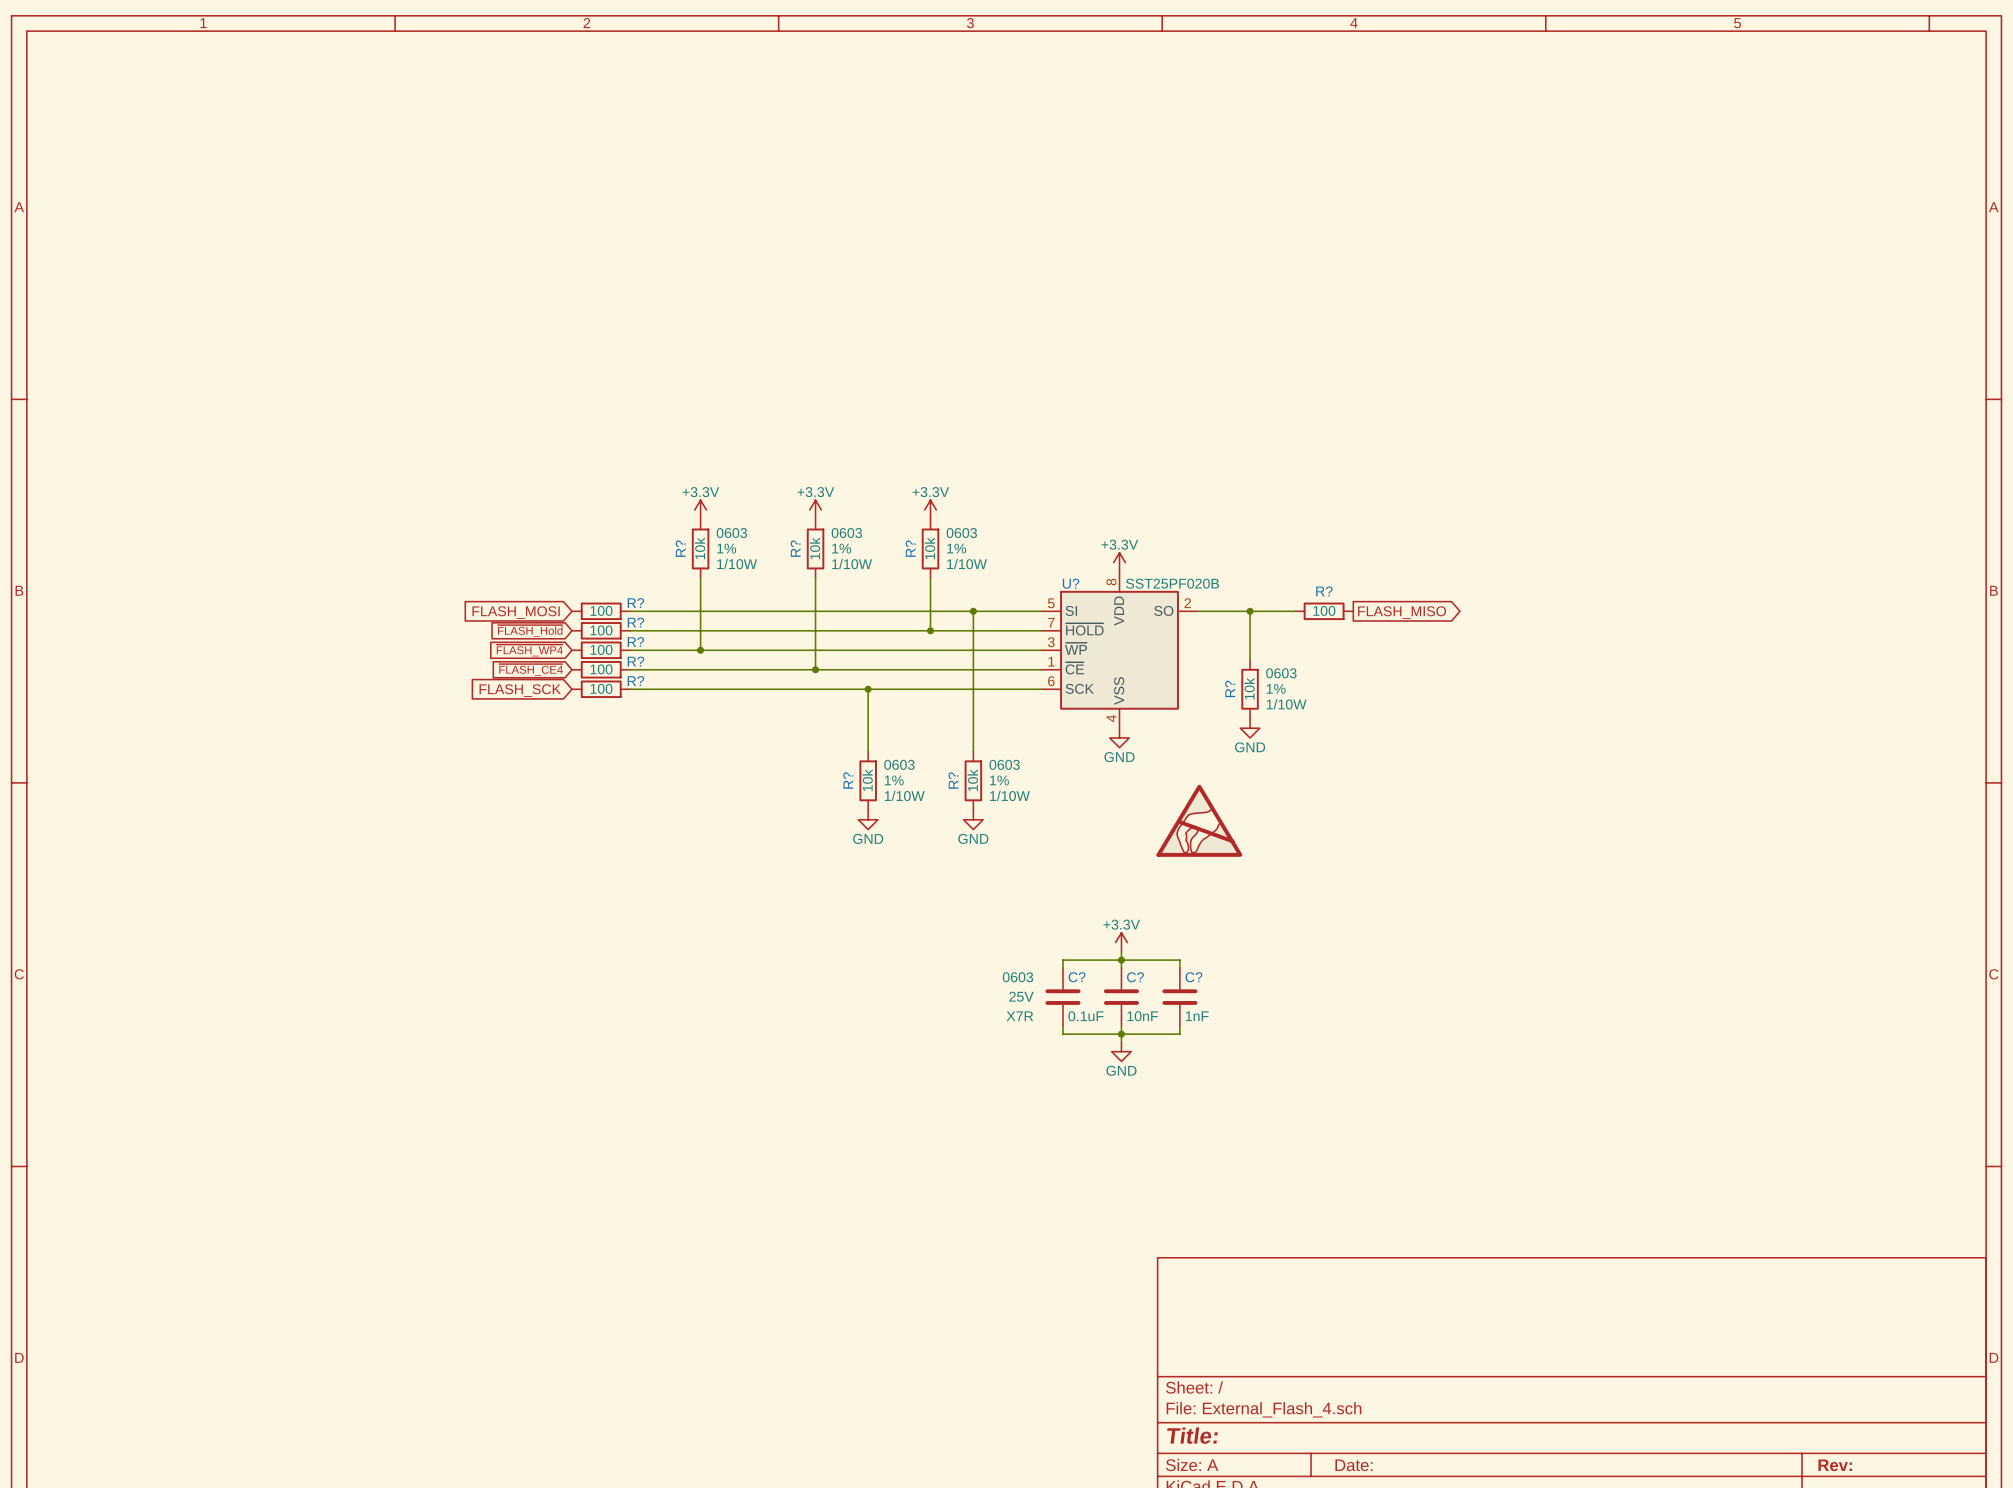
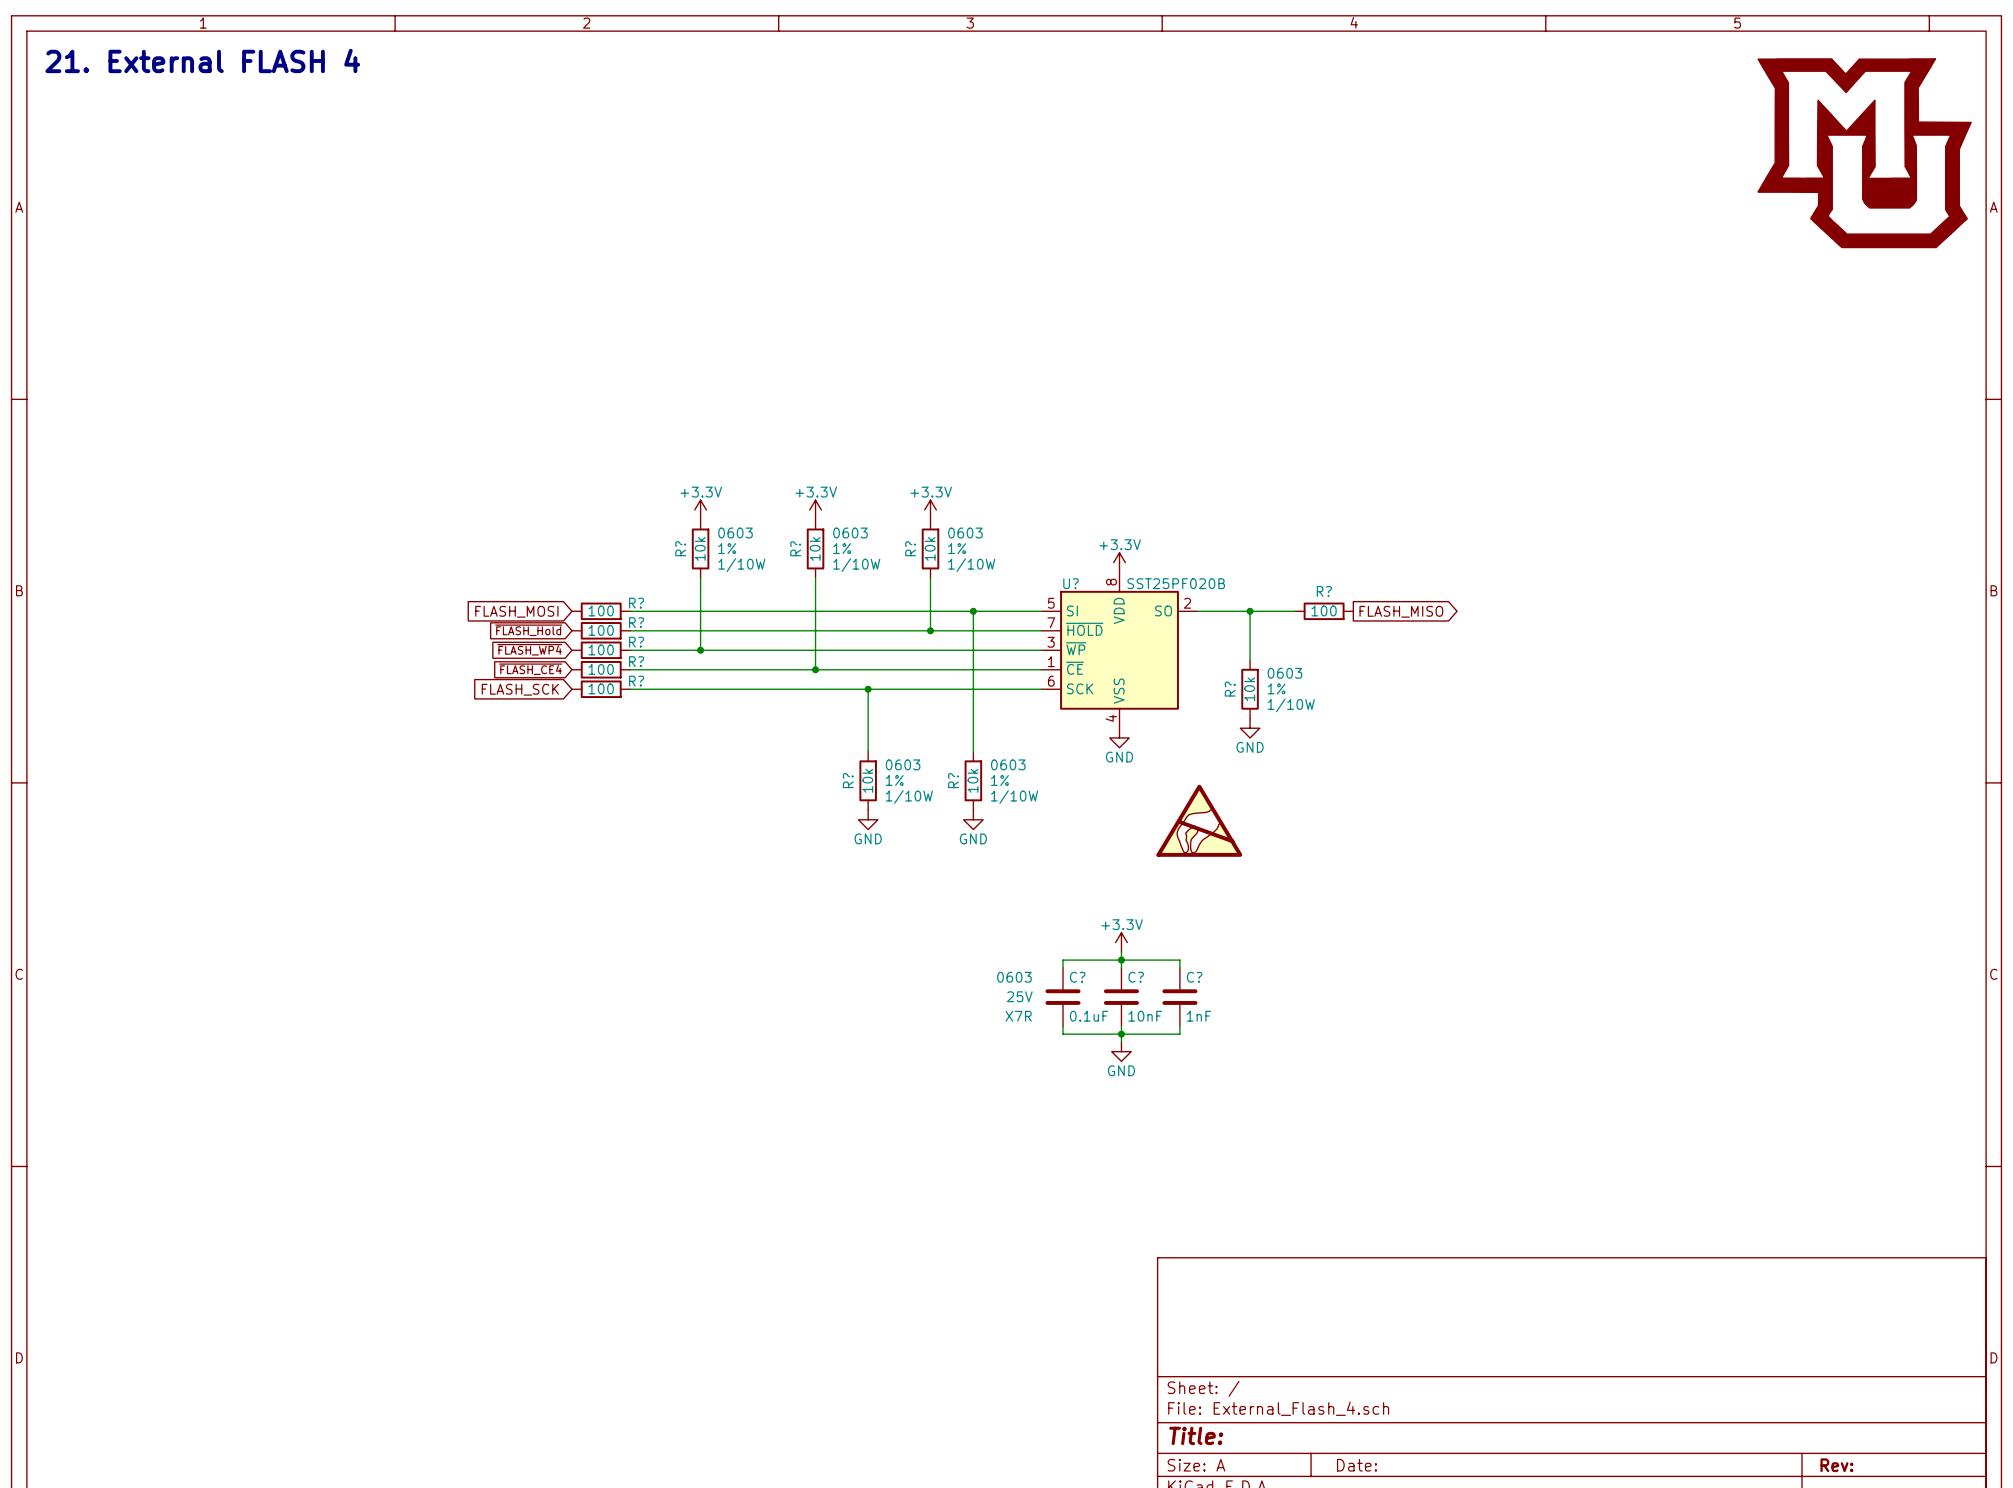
text: none -> 21. External FLASH 4 (202, 60)
power symbol: none -> (1864, 153)

